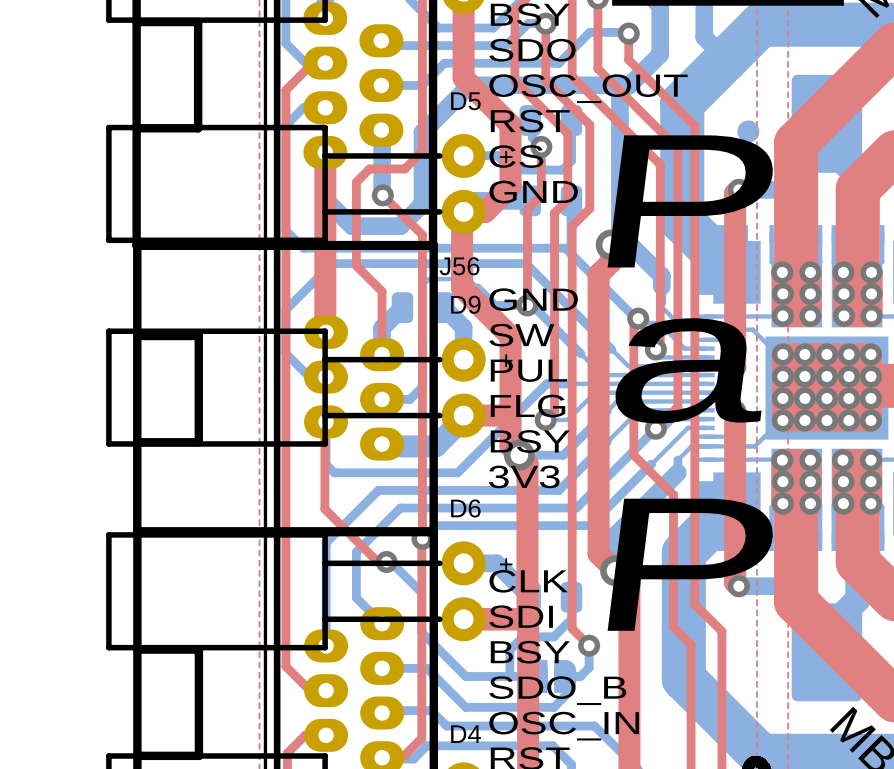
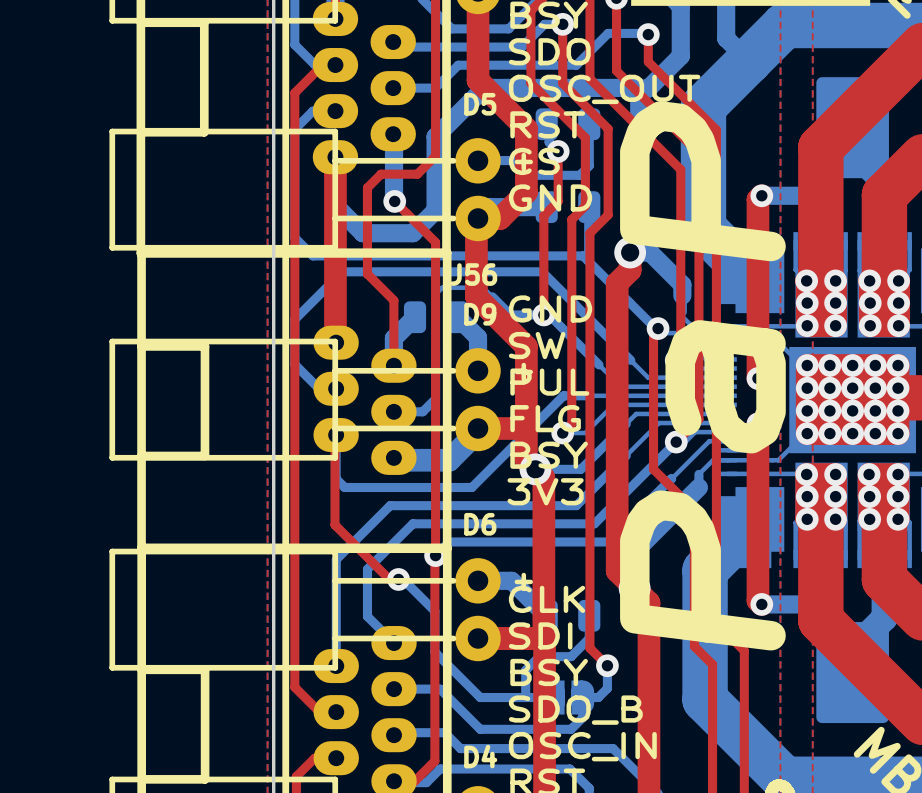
part: (748, 131) -> none
text: P (691, 201) -> none
text: a (687, 370) -> PaP (702, 375)
text: P (691, 564) -> none

